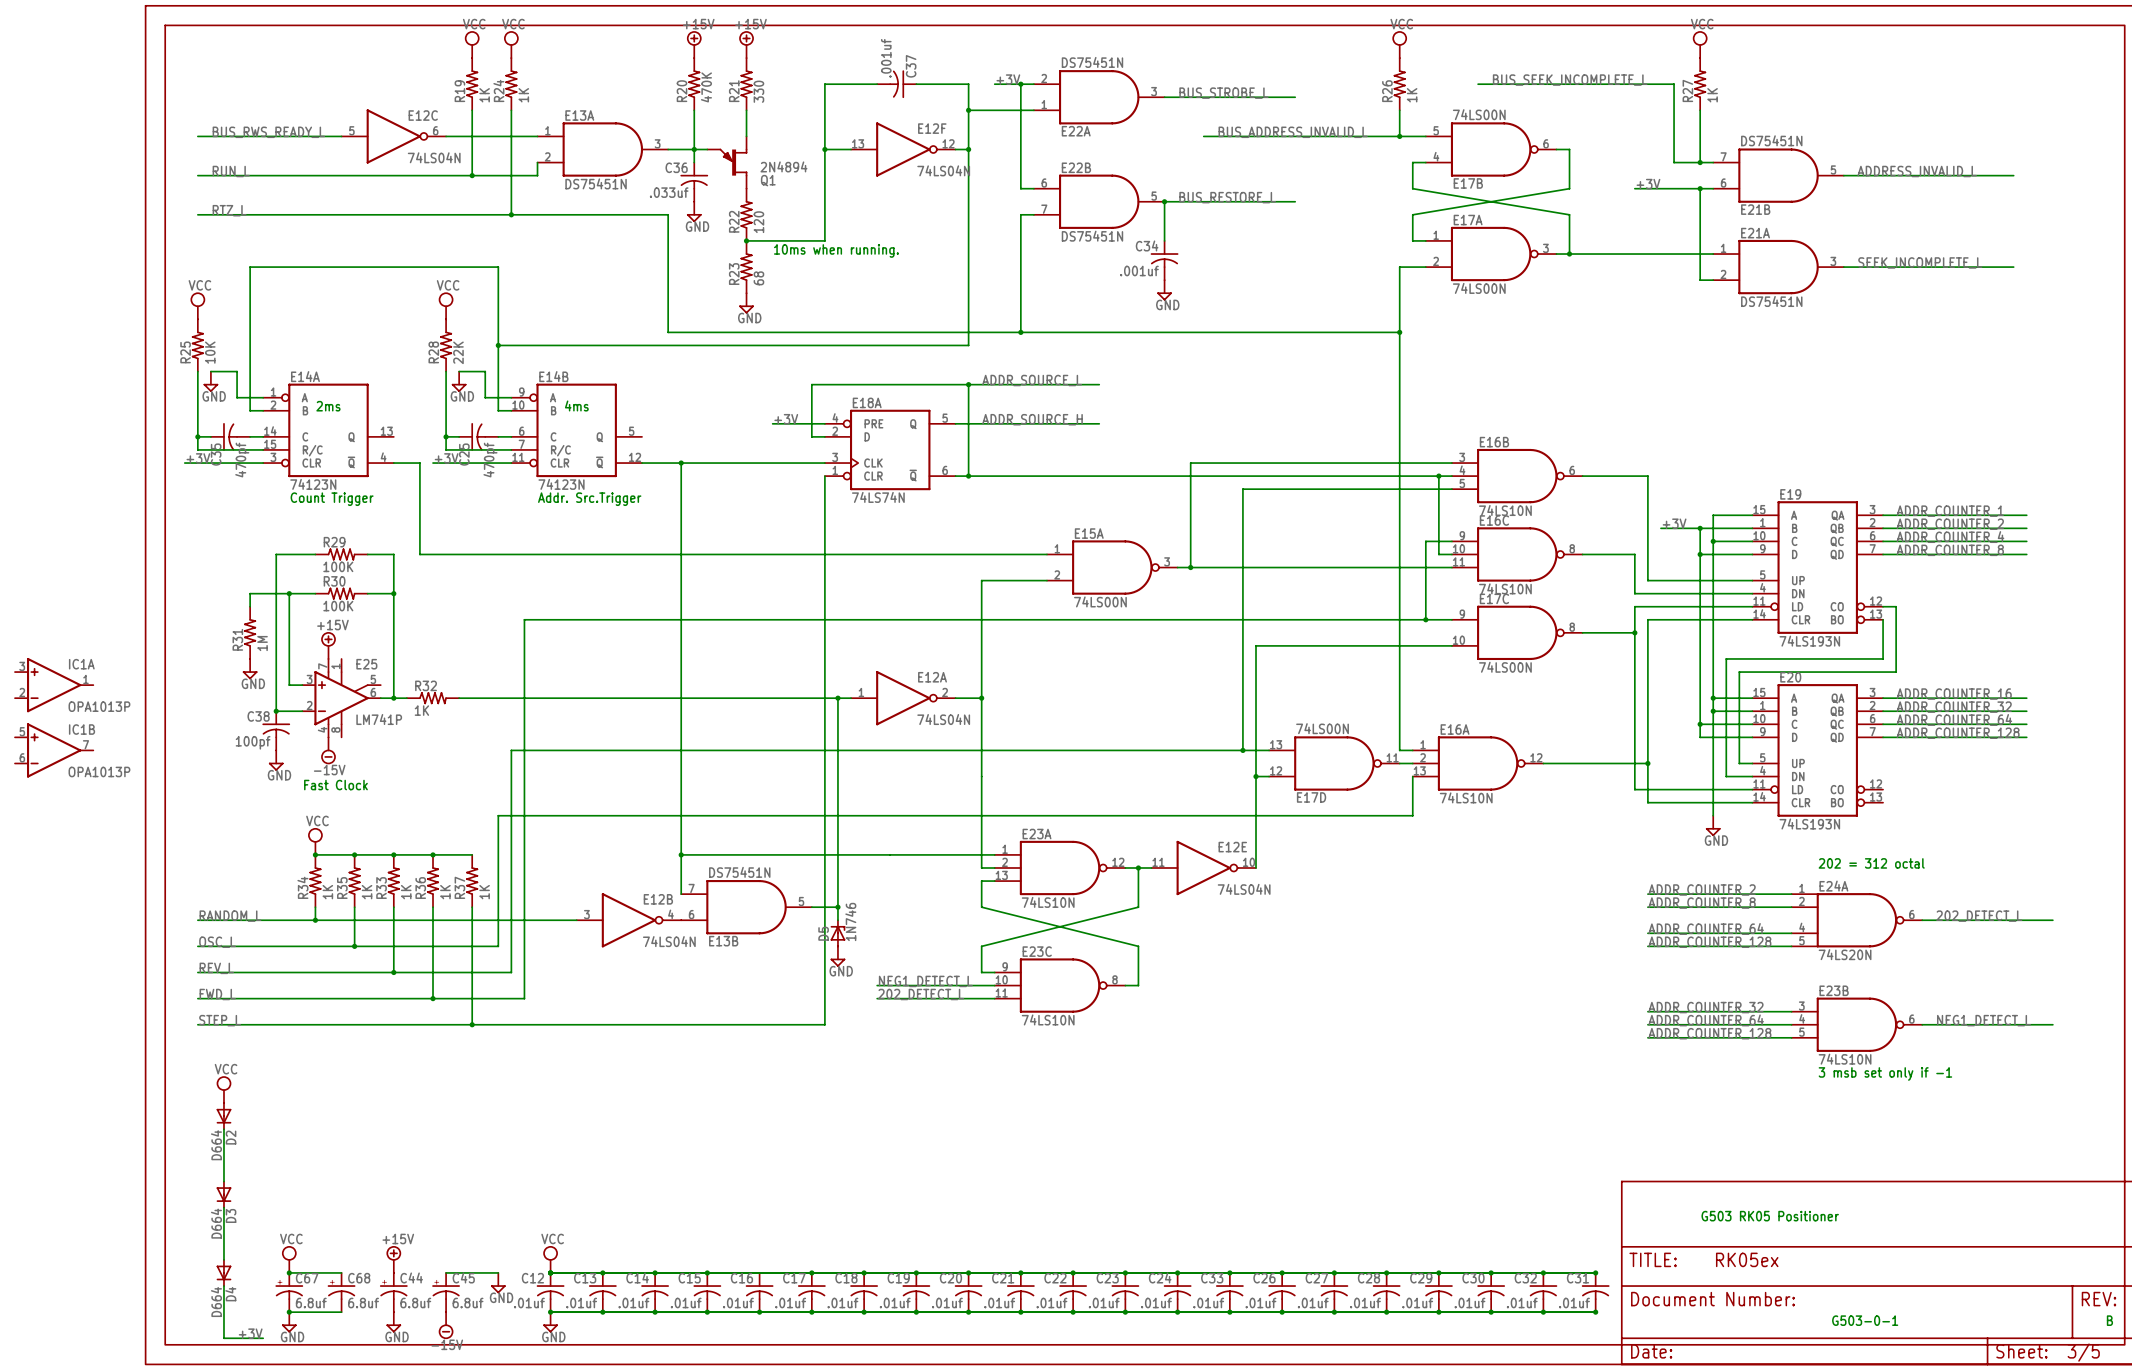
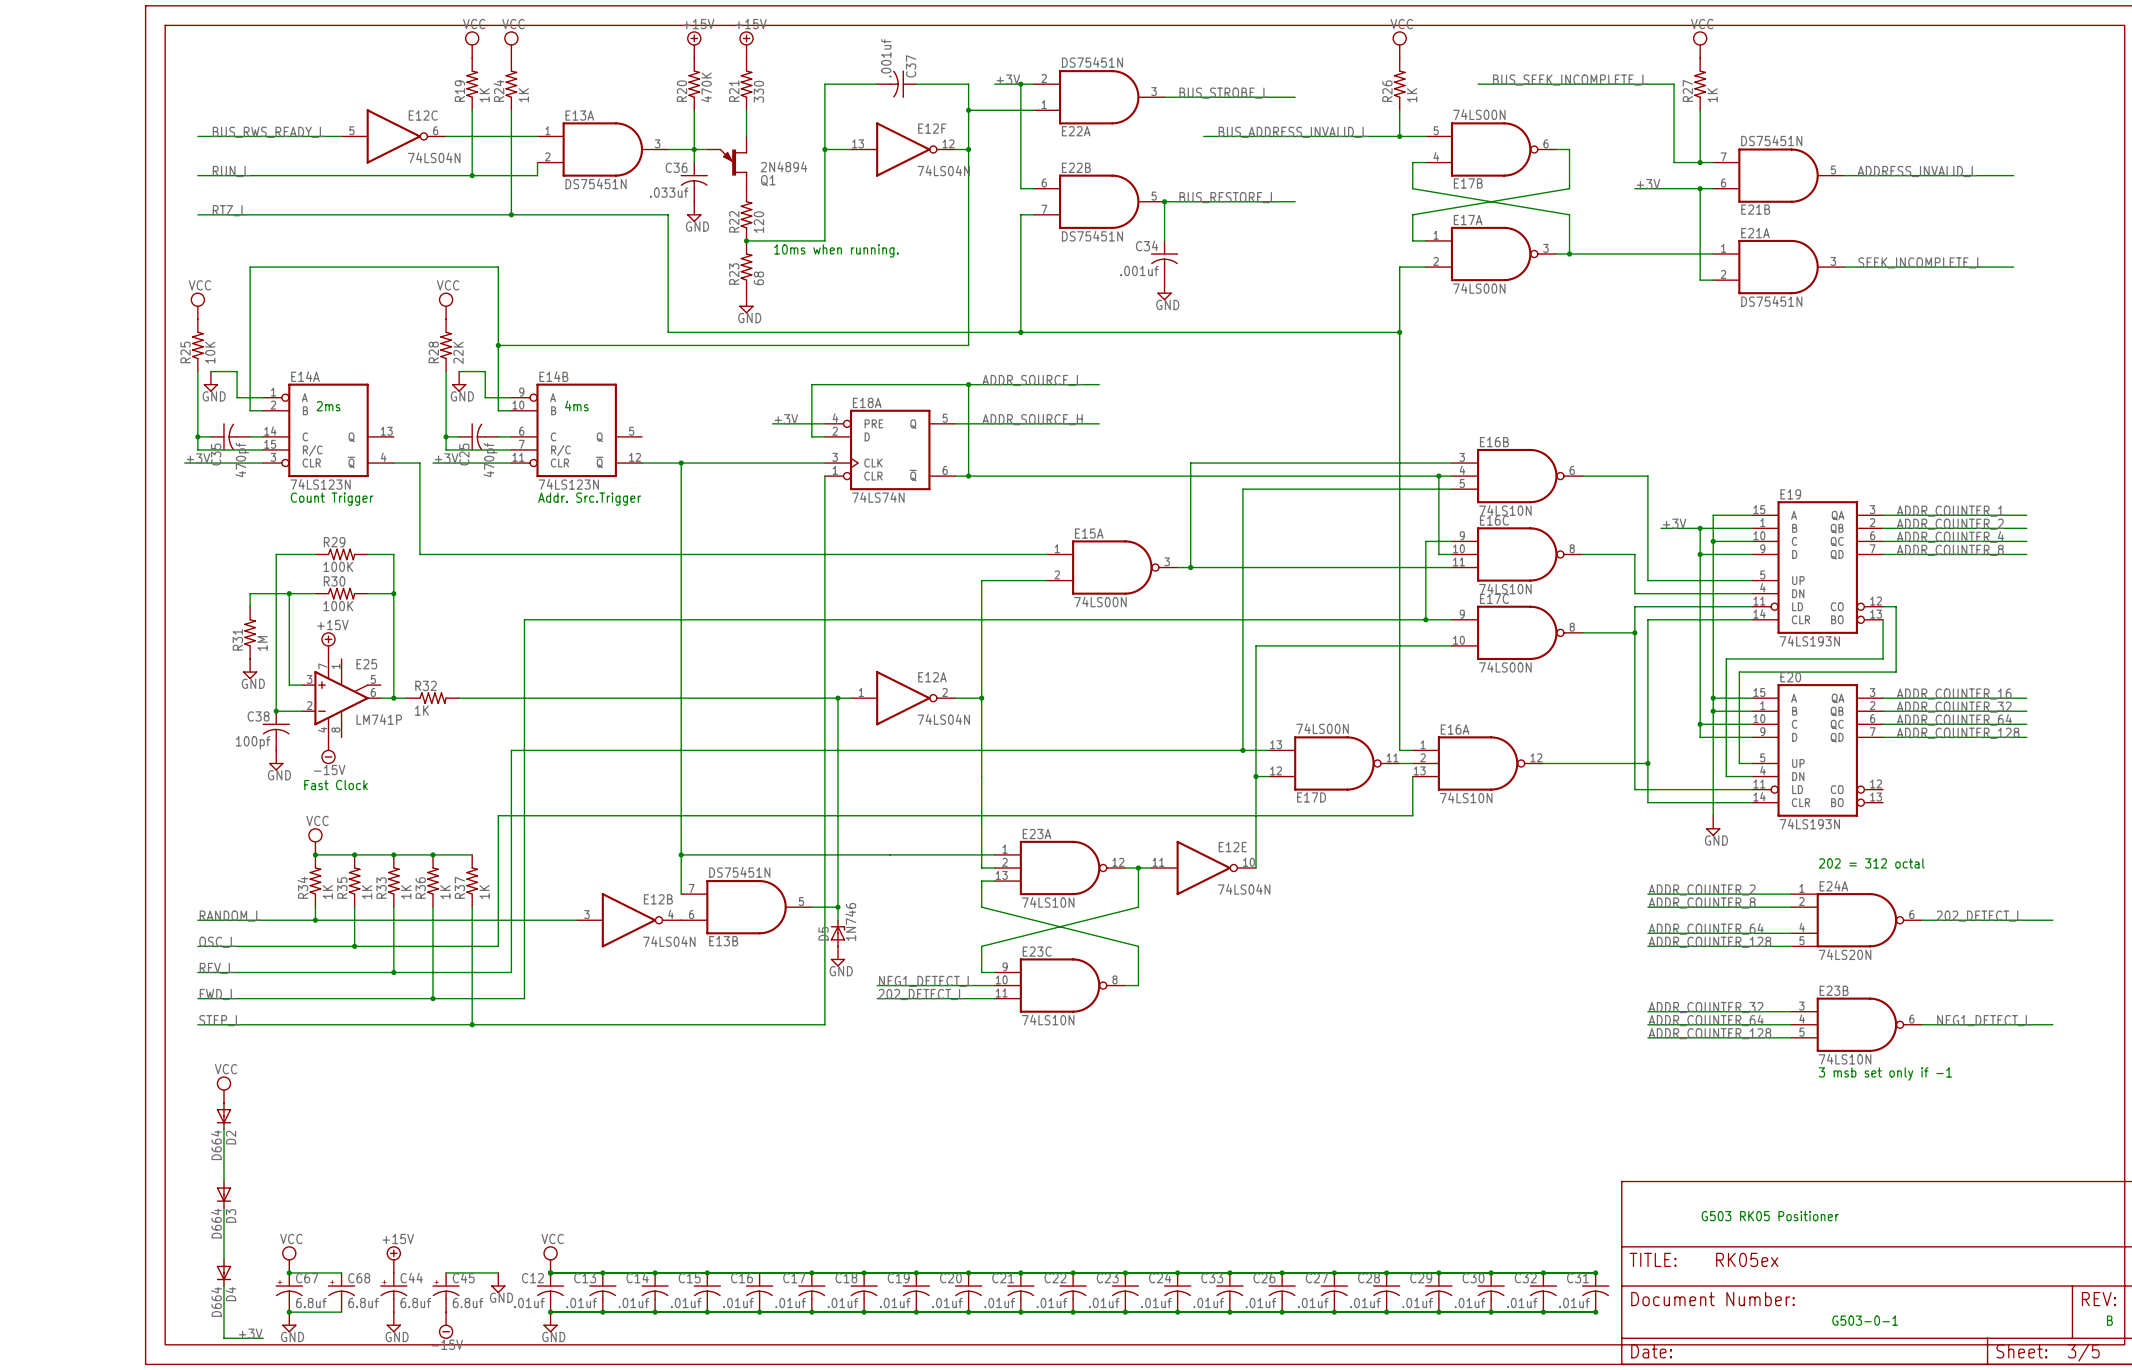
E14A value: 74123N (313, 484) -> 74LS123N (320, 484)
E14B value: 74123N (561, 484) -> 74LS123N (568, 484)
IC1A: OPA1013P (54, 685) -> none
IC1B: OPA1013P (54, 750) -> none

